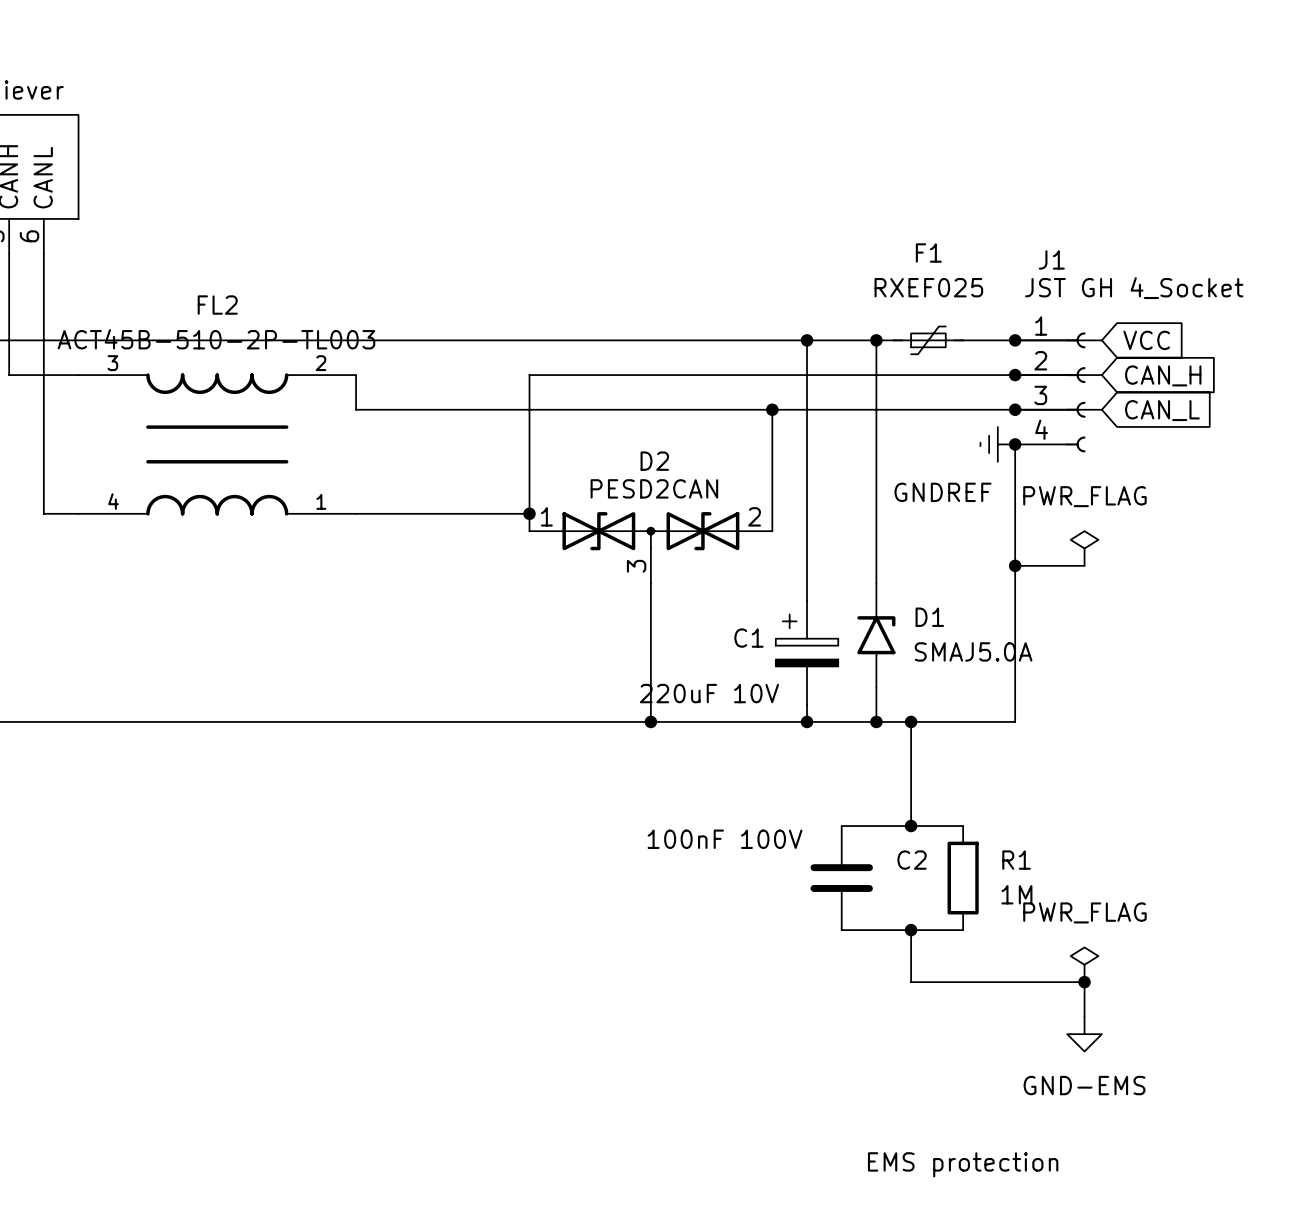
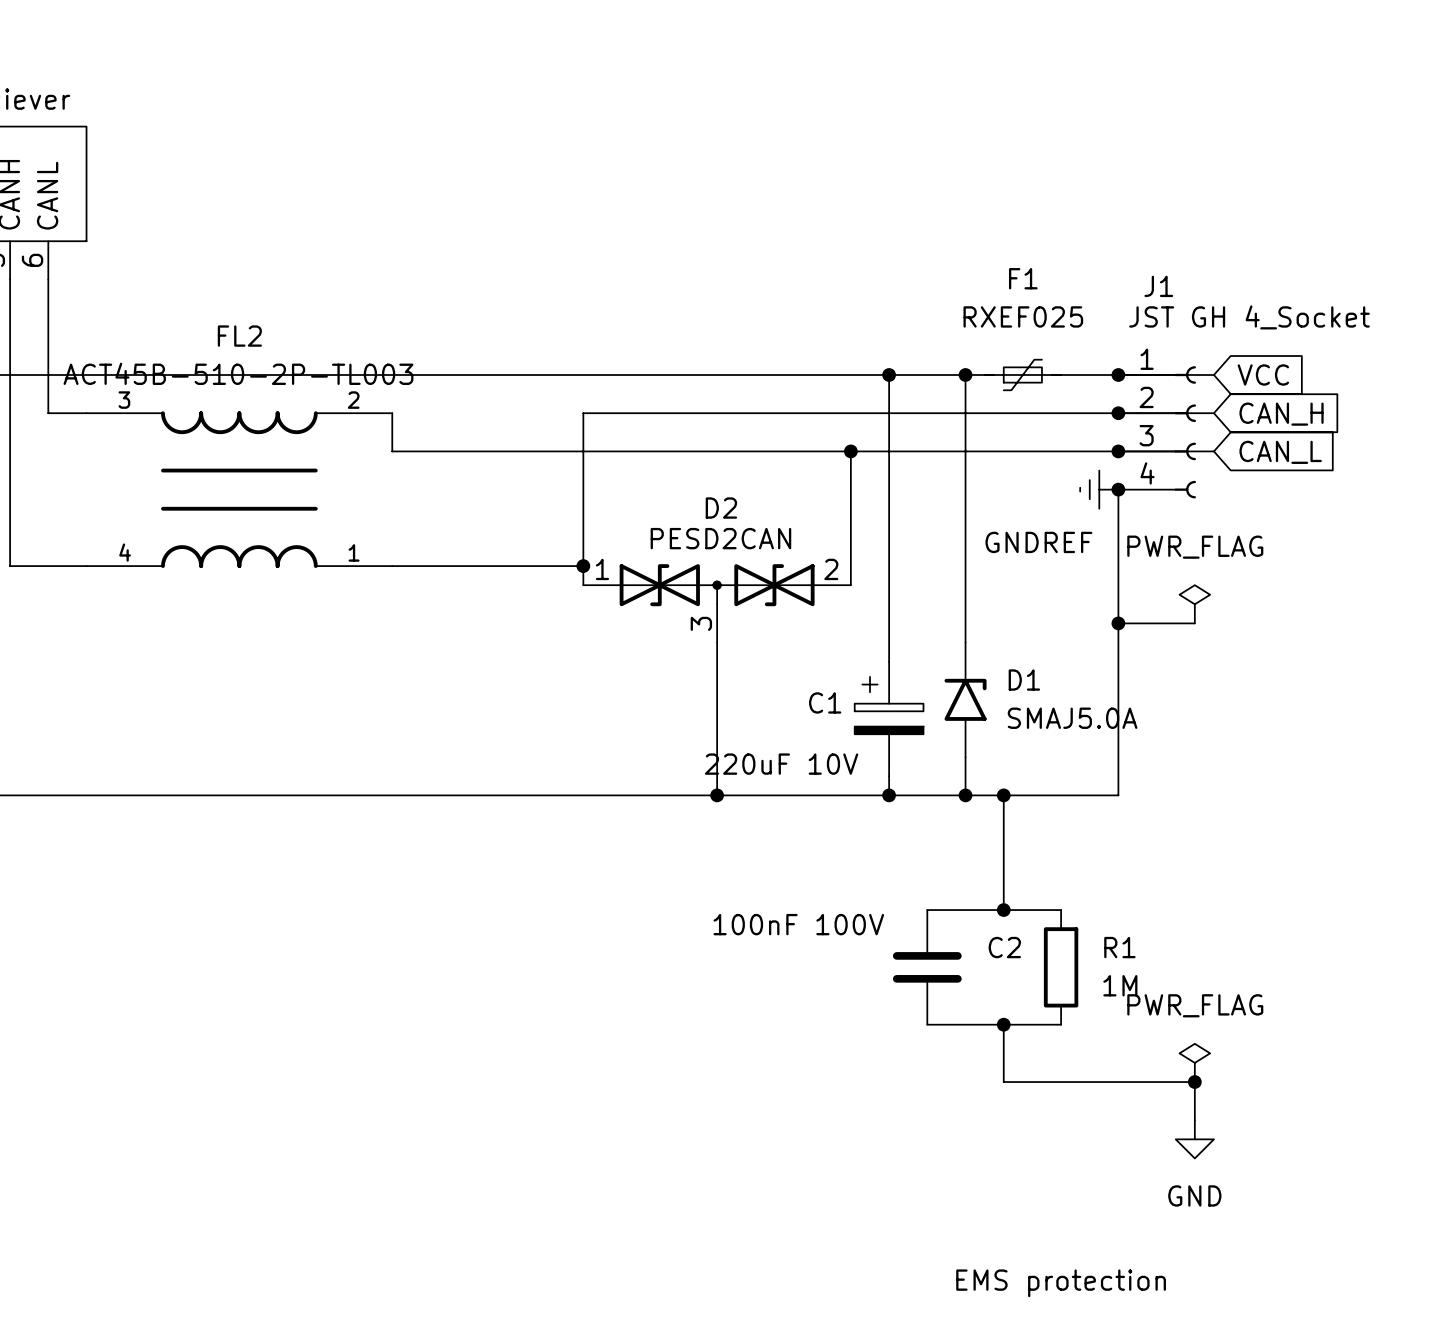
wire: (9, 375) (43, 375) (43, 513) -> (10, 413) (10, 566) (48, 566)
power symbol: GND-EMS (1084, 1034) -> GND (1194, 1139)

